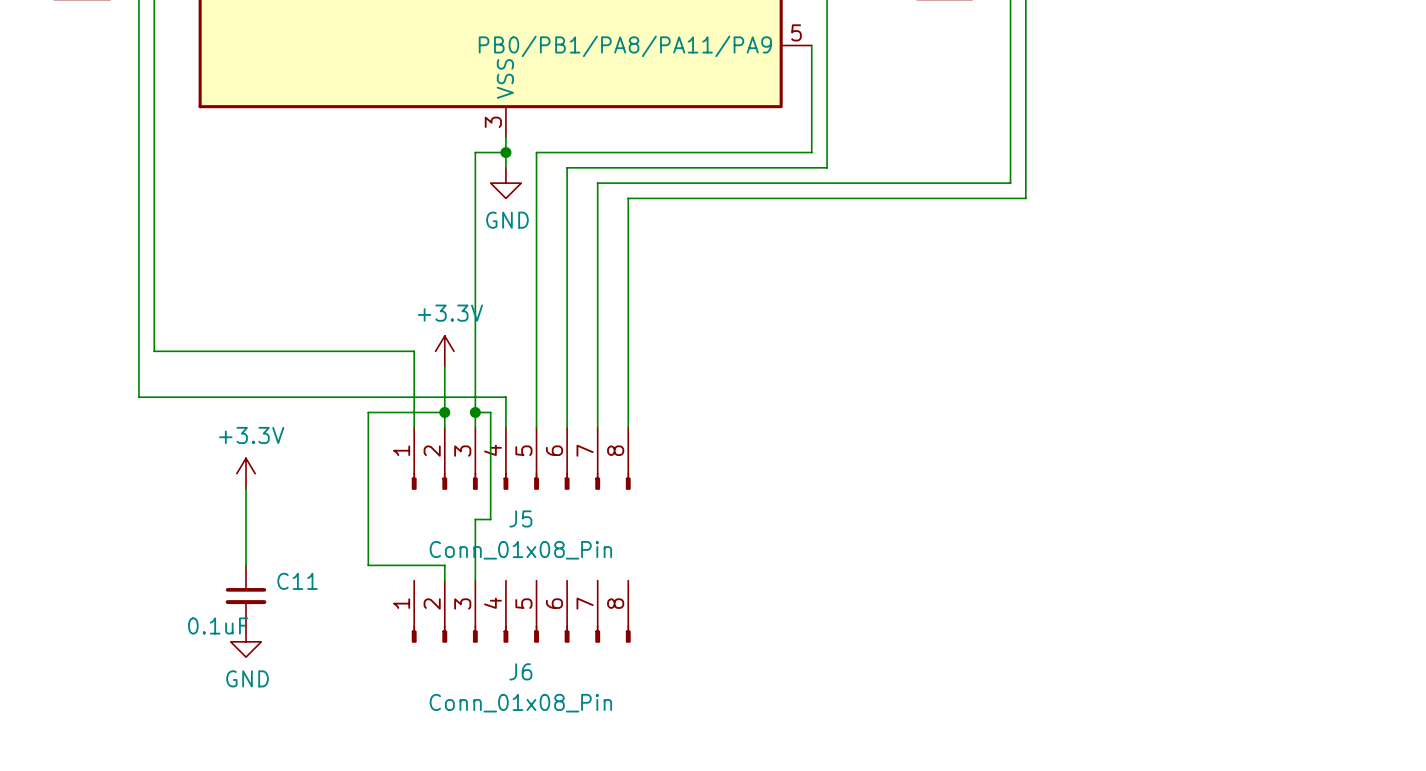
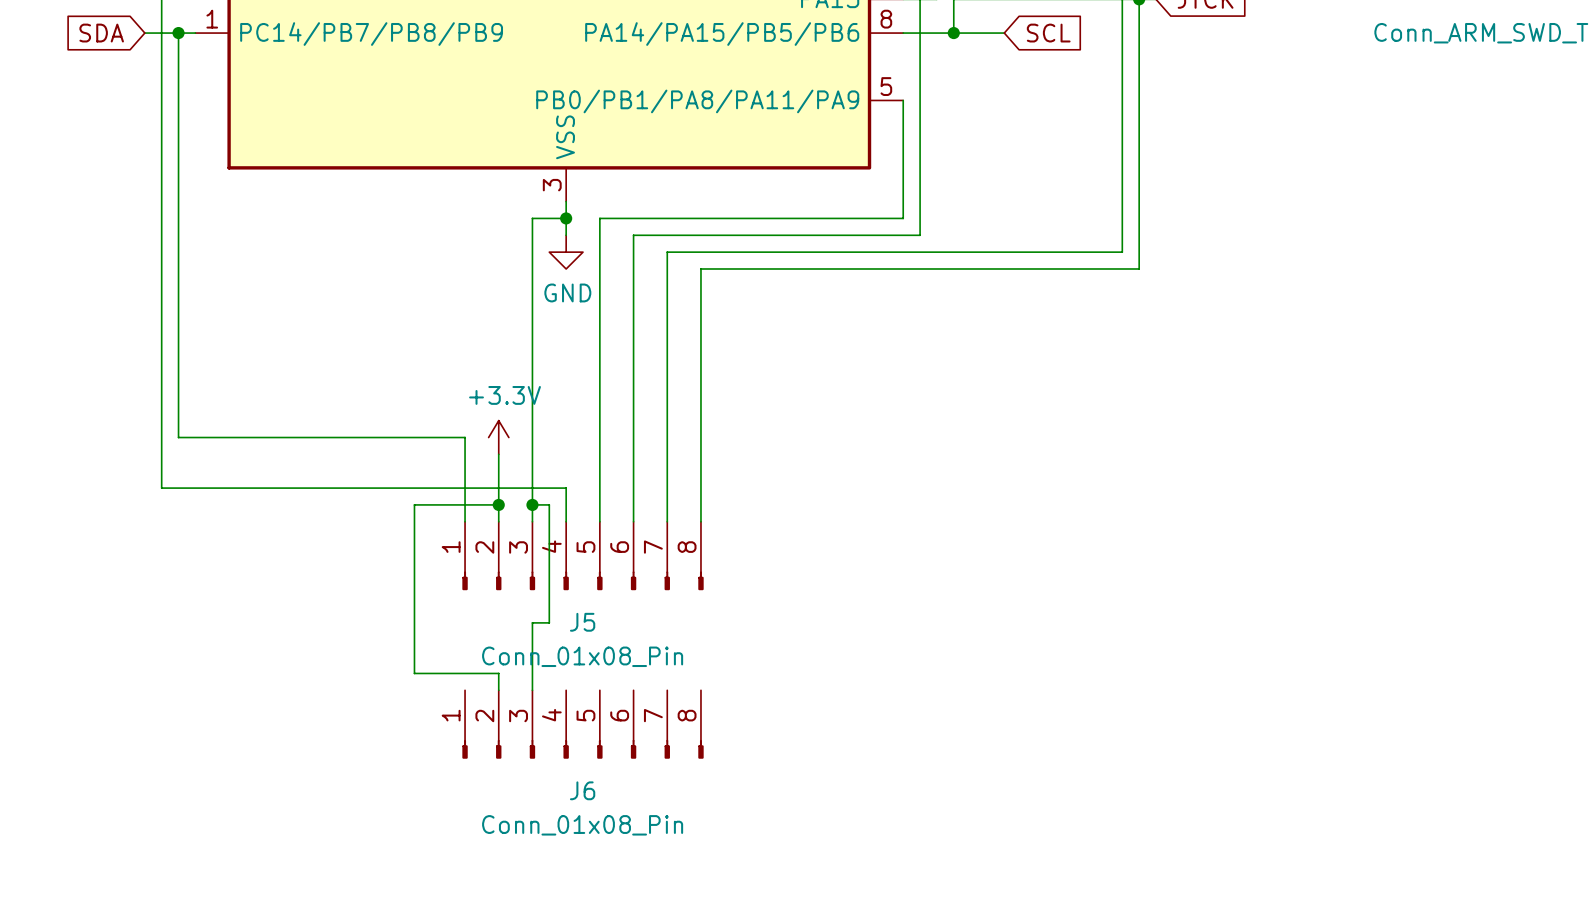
power symbol: +3.3V (246, 473) -> none
wire: (246, 488) (246, 565) -> none
C11: 0.1uF (246, 595) -> none
power symbol: GND (246, 641) -> none

